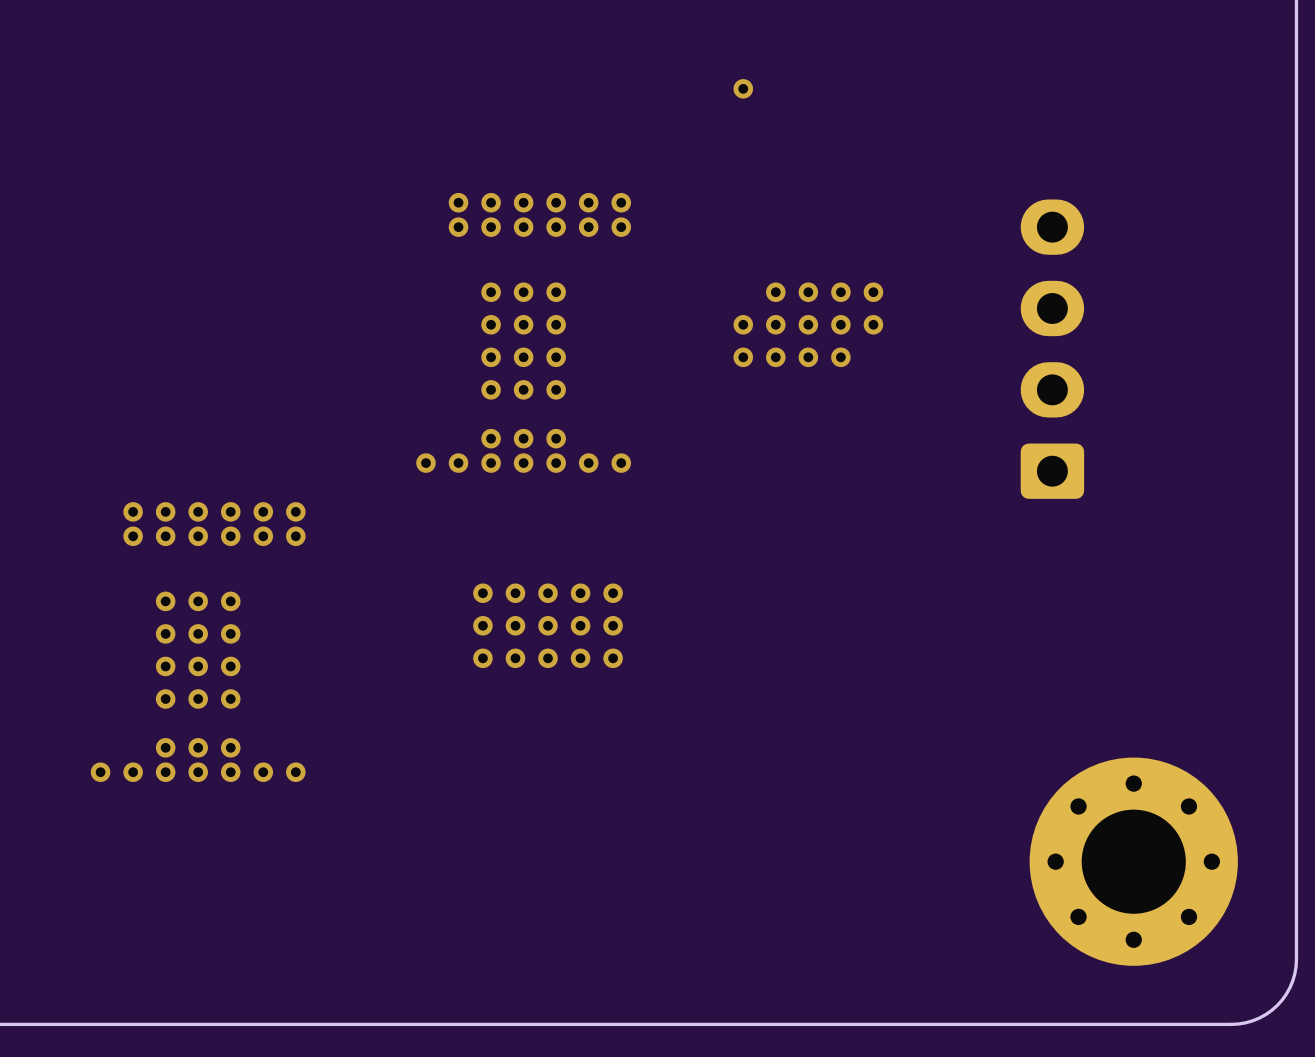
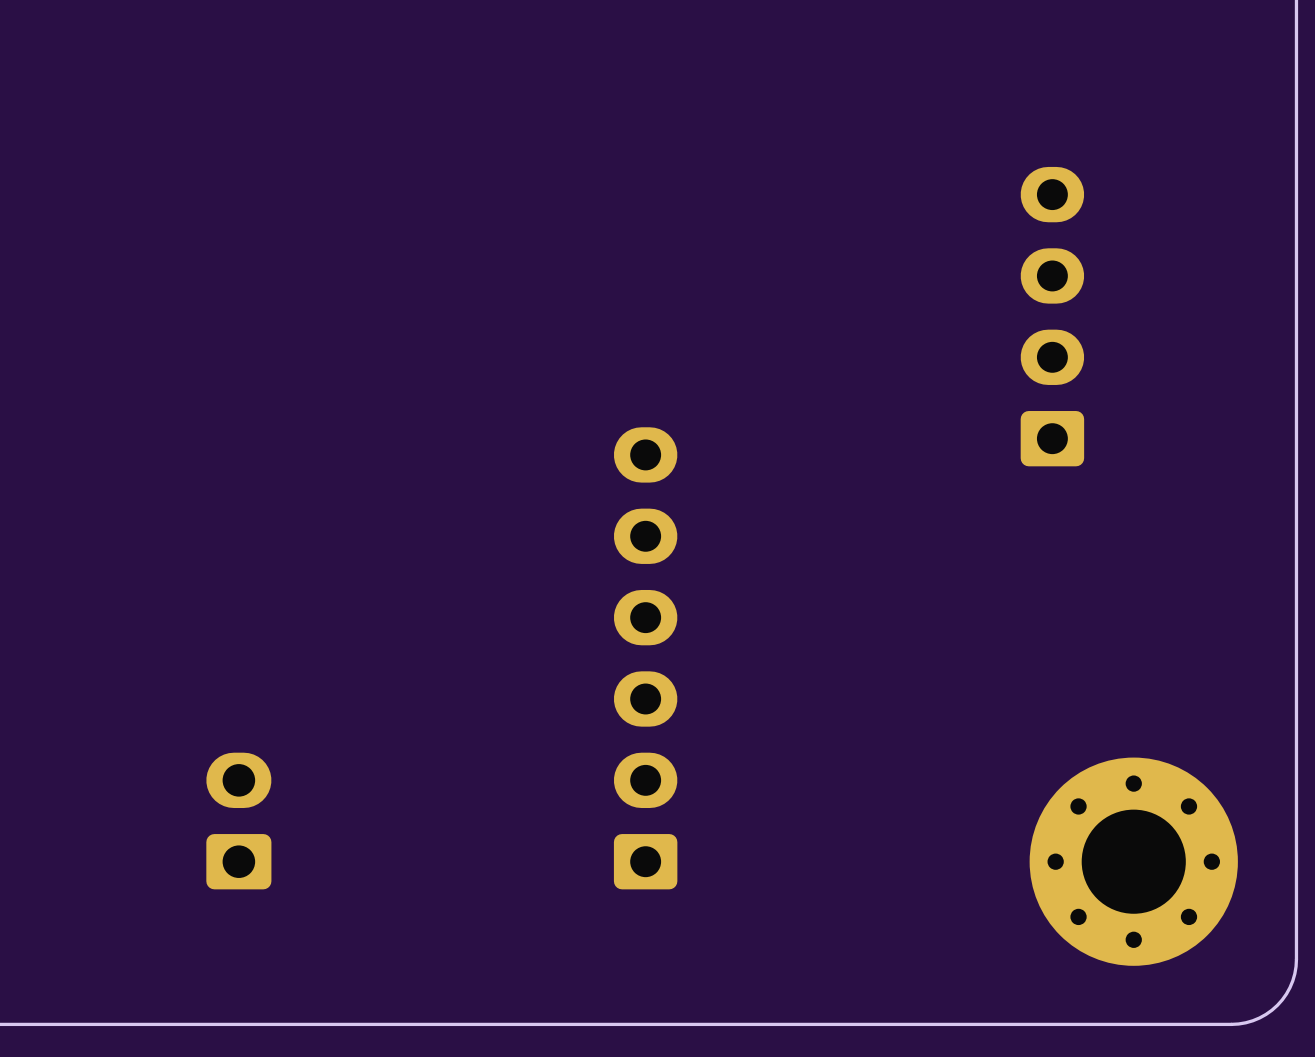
via: (743, 88) -> none
via: (458, 202) -> none
via: (491, 202) -> none
via: (523, 202) -> none
via: (556, 202) -> none
via: (588, 202) -> none
via: (621, 202) -> none
via: (458, 227) -> none
via: (491, 227) -> none
via: (523, 227) -> none
via: (556, 227) -> none
via: (588, 227) -> none
via: (621, 227) -> none
via: (491, 292) -> none
via: (523, 292) -> none
via: (556, 292) -> none
via: (775, 292) -> none
via: (808, 292) -> none
via: (840, 292) -> none
via: (873, 292) -> none
via: (491, 324) -> none
via: (523, 324) -> none
via: (556, 324) -> none
via: (743, 324) -> none
via: (775, 324) -> none
via: (808, 324) -> none
via: (840, 324) -> none
via: (873, 324) -> none
part position: (1052, 349) -> (1052, 316)
via: (491, 357) -> none
via: (523, 357) -> none
via: (556, 357) -> none
via: (743, 357) -> none
via: (775, 357) -> none
via: (808, 357) -> none
via: (840, 357) -> none
via: (491, 389) -> none
via: (523, 389) -> none
via: (556, 389) -> none
via: (491, 438) -> none
via: (523, 438) -> none
via: (556, 438) -> none
via: (425, 463) -> none
via: (458, 463) -> none
via: (491, 463) -> none
via: (523, 463) -> none
via: (556, 463) -> none
via: (588, 463) -> none
via: (621, 463) -> none
via: (133, 511) -> none
via: (165, 511) -> none
via: (198, 511) -> none
via: (230, 511) -> none
via: (263, 511) -> none
via: (295, 511) -> none
via: (133, 536) -> none
via: (165, 536) -> none
via: (198, 536) -> none
via: (230, 536) -> none
via: (263, 536) -> none
via: (295, 536) -> none
via: (482, 593) -> none
via: (515, 593) -> none
via: (548, 593) -> none
via: (580, 593) -> none
via: (613, 593) -> none
via: (165, 601) -> none
via: (198, 601) -> none
via: (230, 601) -> none
via: (482, 625) -> none
via: (515, 625) -> none
via: (548, 625) -> none
via: (580, 625) -> none
via: (613, 625) -> none
via: (165, 633) -> none
via: (198, 633) -> none
via: (230, 633) -> none
via: (482, 658) -> none
via: (515, 658) -> none
via: (548, 658) -> none
via: (580, 658) -> none
via: (613, 658) -> none
part: none -> (645, 658)
via: (165, 666) -> none
via: (198, 666) -> none
via: (230, 666) -> none
via: (165, 698) -> none
via: (198, 698) -> none
via: (230, 698) -> none
via: (165, 747) -> none
via: (198, 747) -> none
via: (230, 747) -> none
via: (100, 772) -> none
via: (133, 772) -> none
via: (165, 772) -> none
via: (198, 772) -> none
via: (230, 772) -> none
via: (263, 772) -> none
via: (295, 772) -> none
part: none -> (238, 821)

